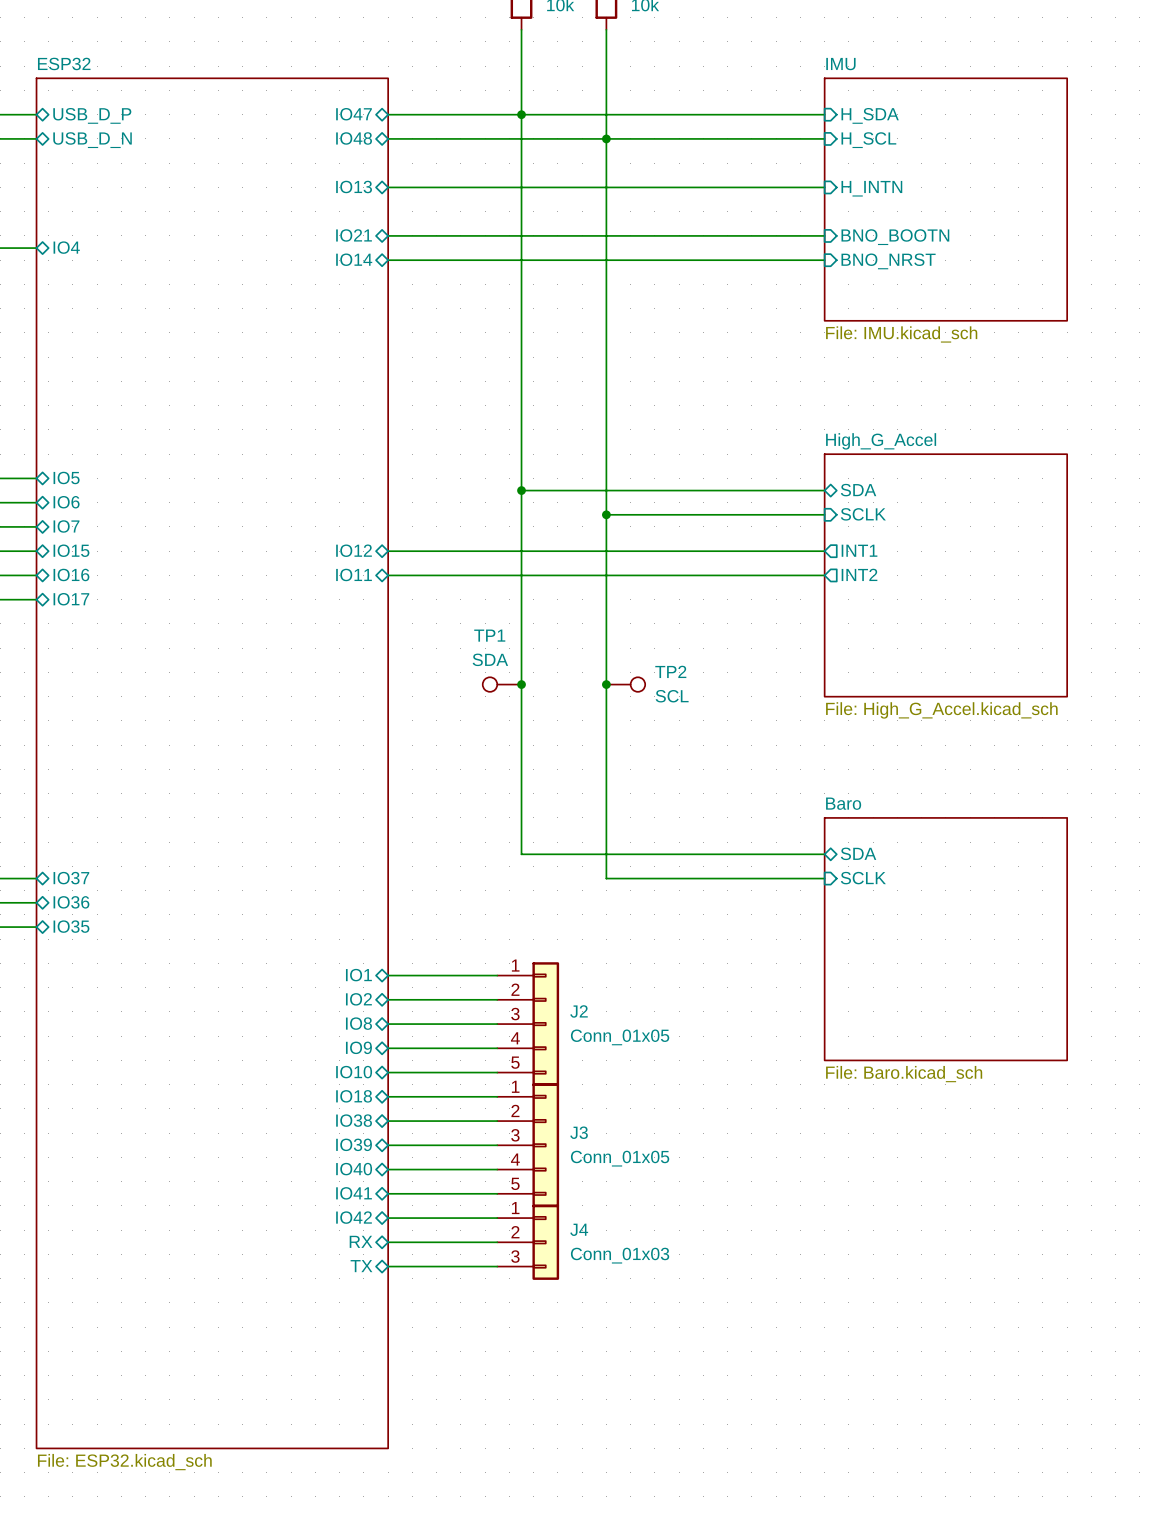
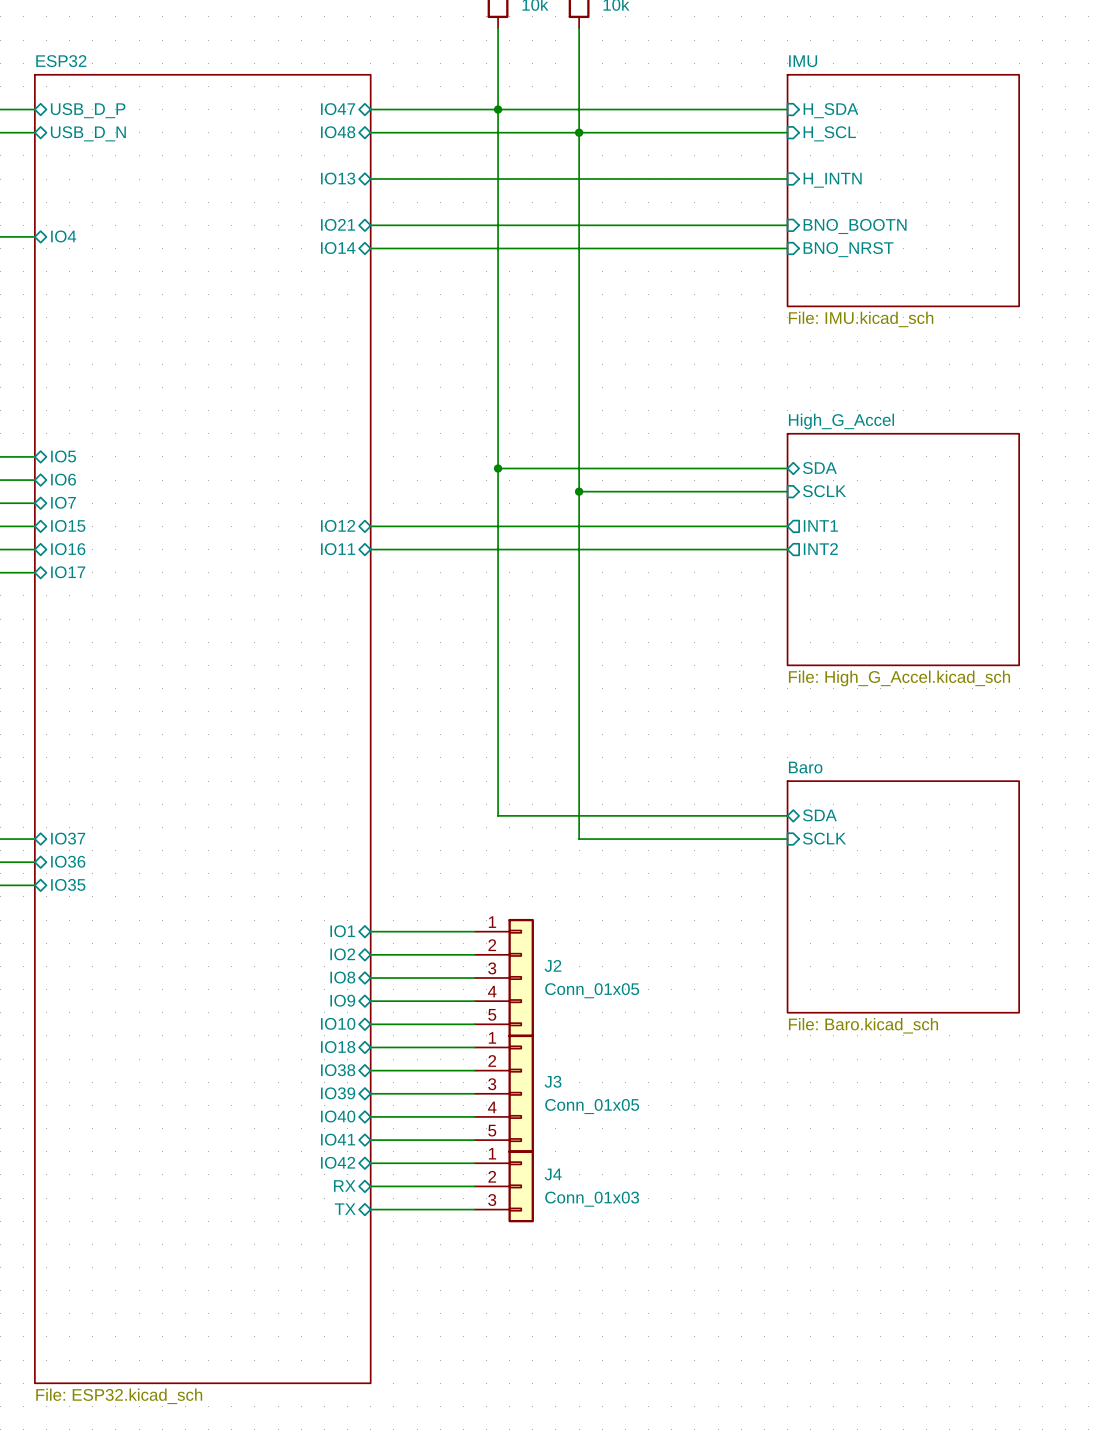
TP1: SDA (502, 684) -> none
junction: (521, 684) -> none
junction: (606, 684) -> none
TP2: SCL (625, 684) -> none

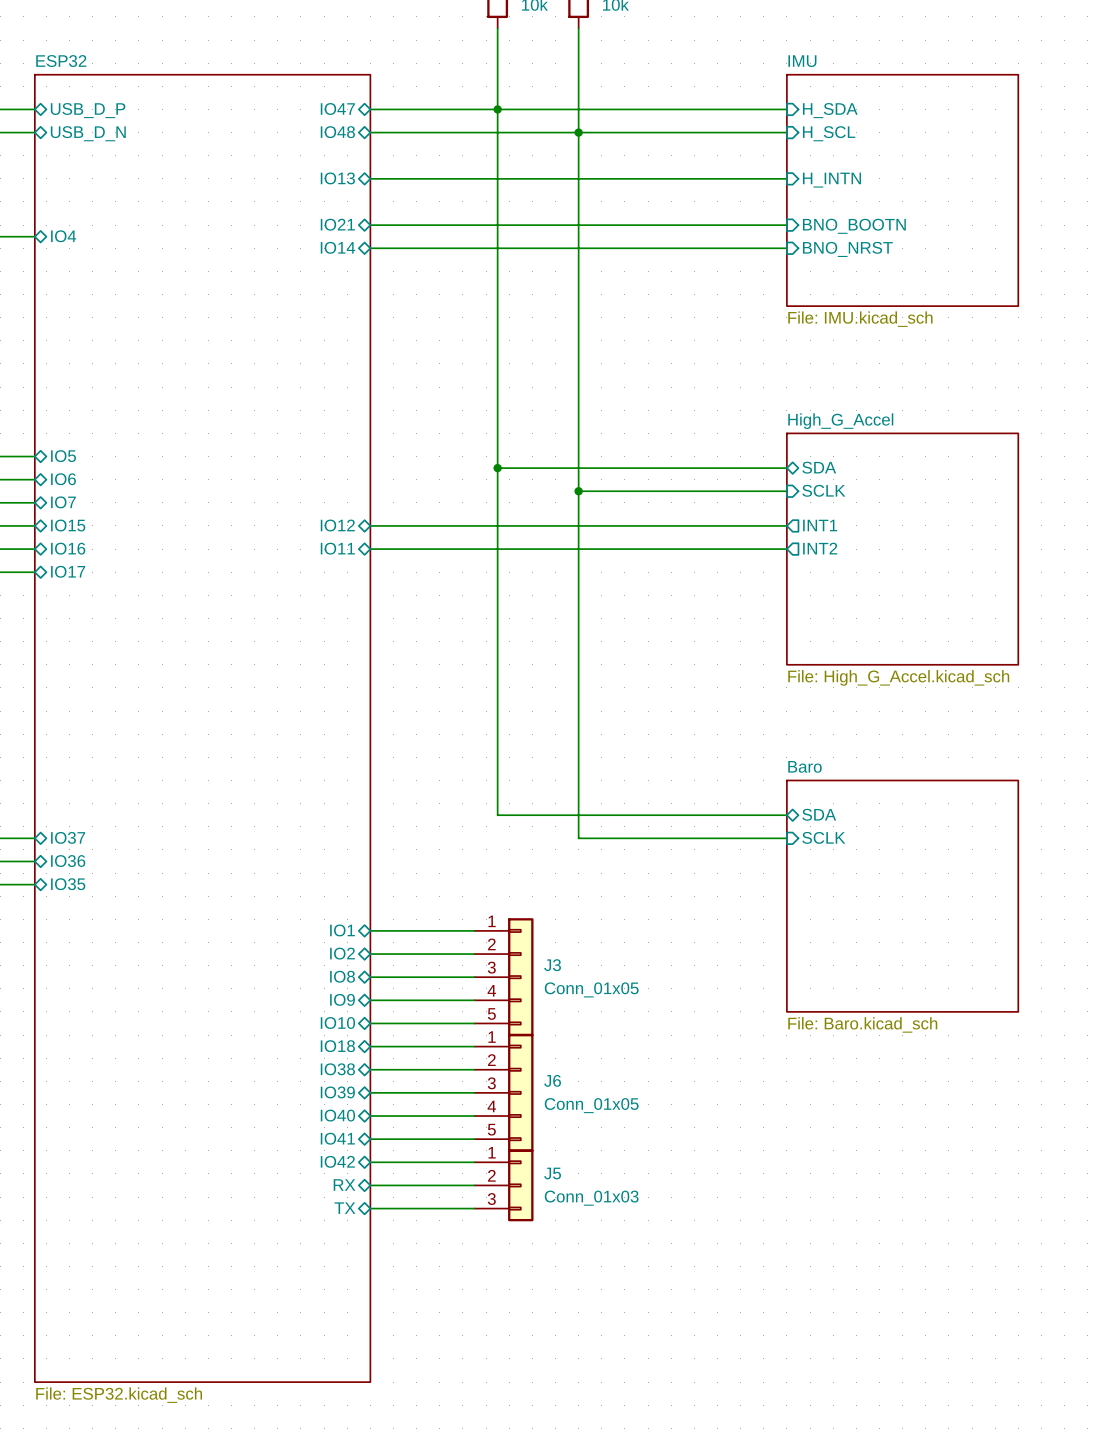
J2 name: J2 (552, 965) -> J3 (552, 965)
J3 name: J3 (553, 1081) -> J6 (552, 1080)
J4 name: J4 (553, 1174) -> J5 (552, 1173)

